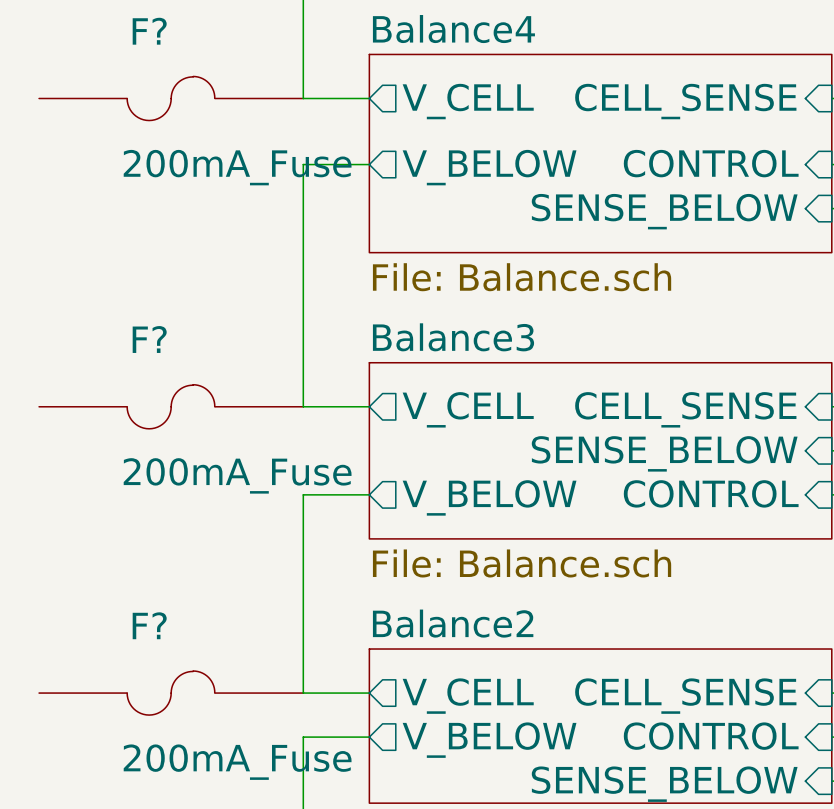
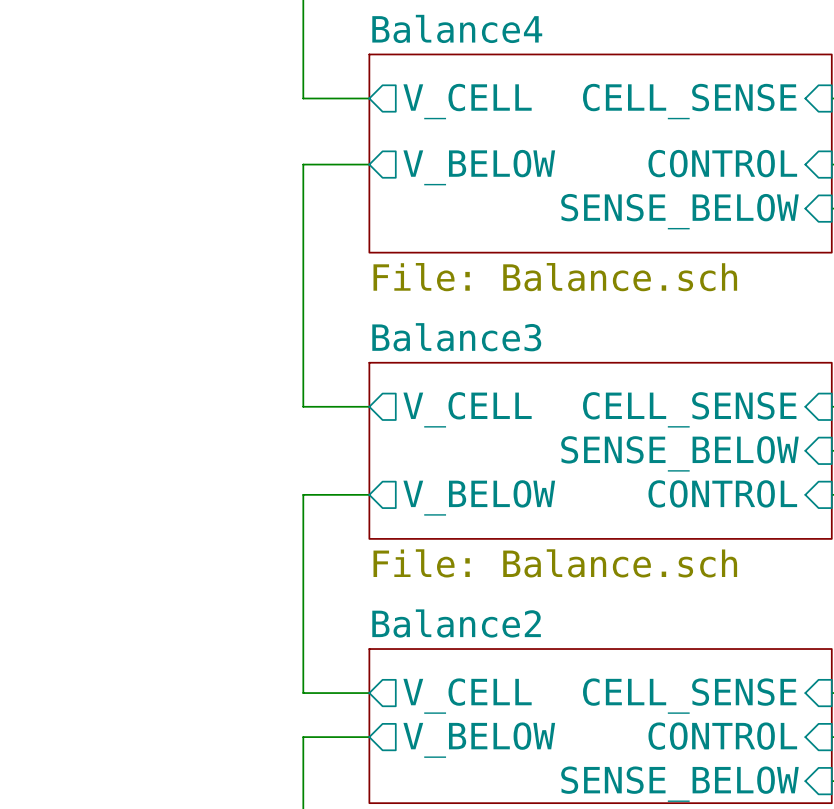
F?: 200mA_Fuse (171, 98) -> none
F?: 200mA_Fuse (171, 406) -> none
F?: 200mA_Fuse (171, 693) -> none

